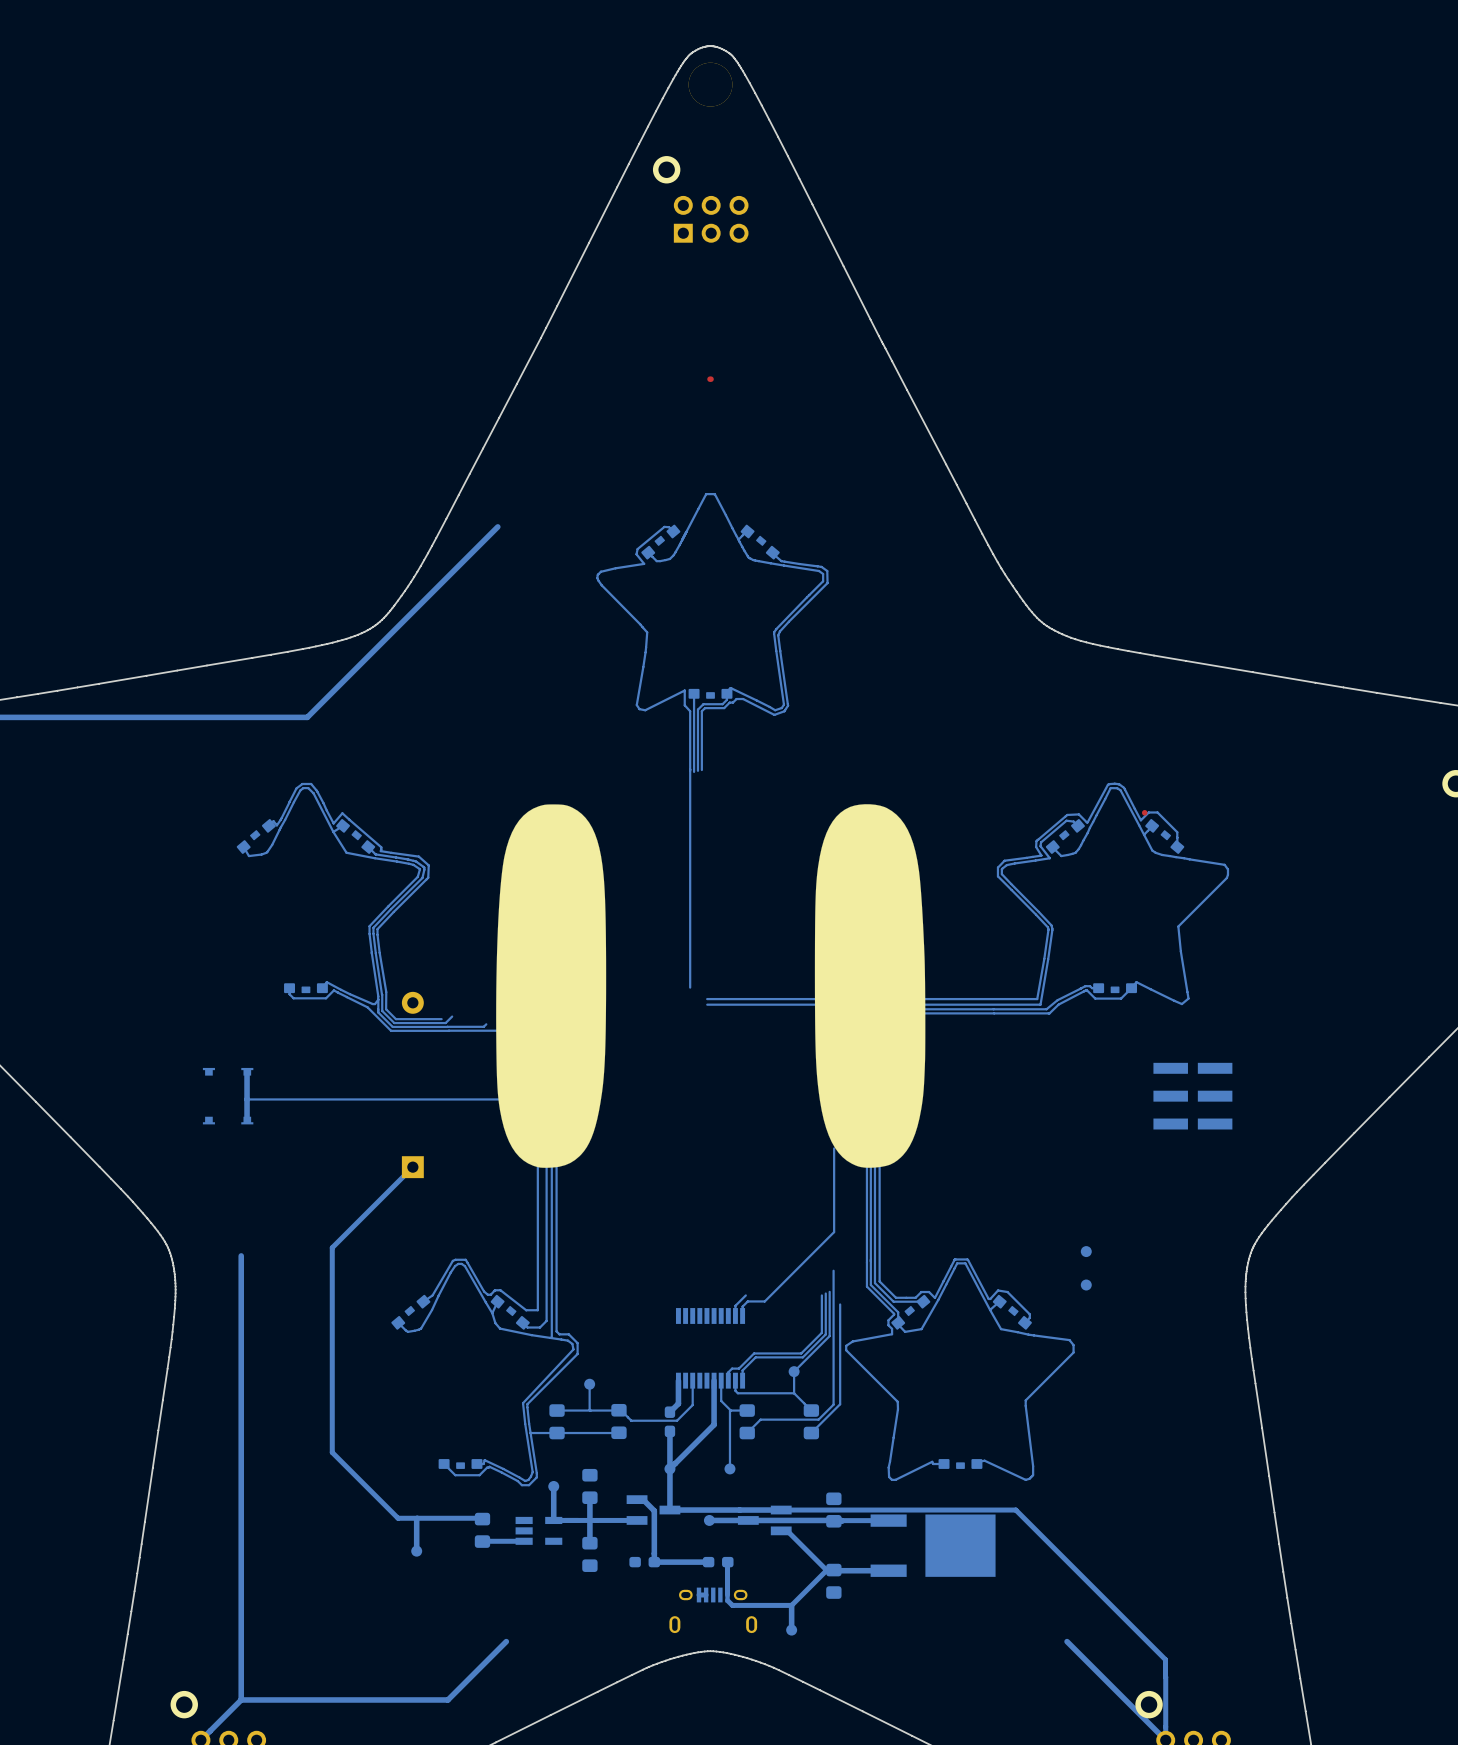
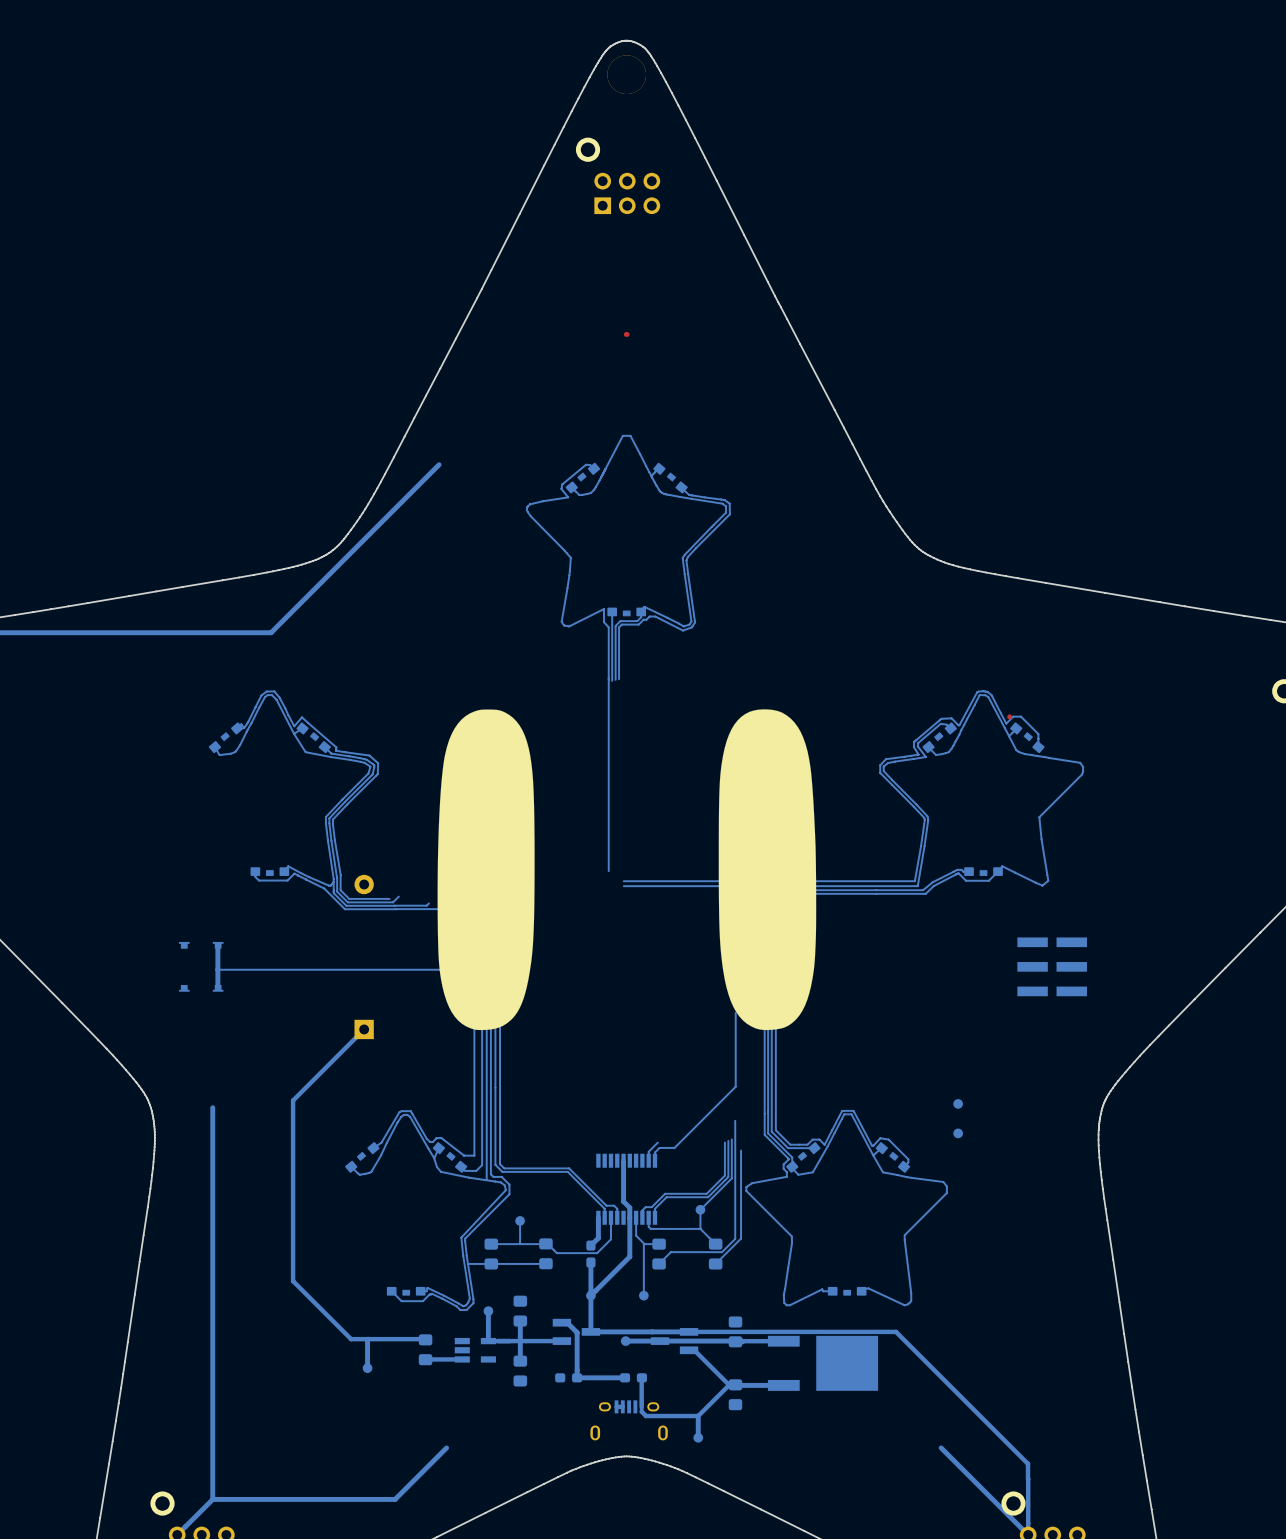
bottom track: none -> (495, 996) (495, 1164) (502, 1171) (567, 1171) (604, 1208) (604, 1217)
bottom track: none -> (500, 999) (500, 1164) (504, 1168) (569, 1168) (606, 1205) (614, 1205) (617, 1208) (617, 1217)
bottom track: none -> (623, 1160) (623, 1201) (629, 1207) (629, 1217)

